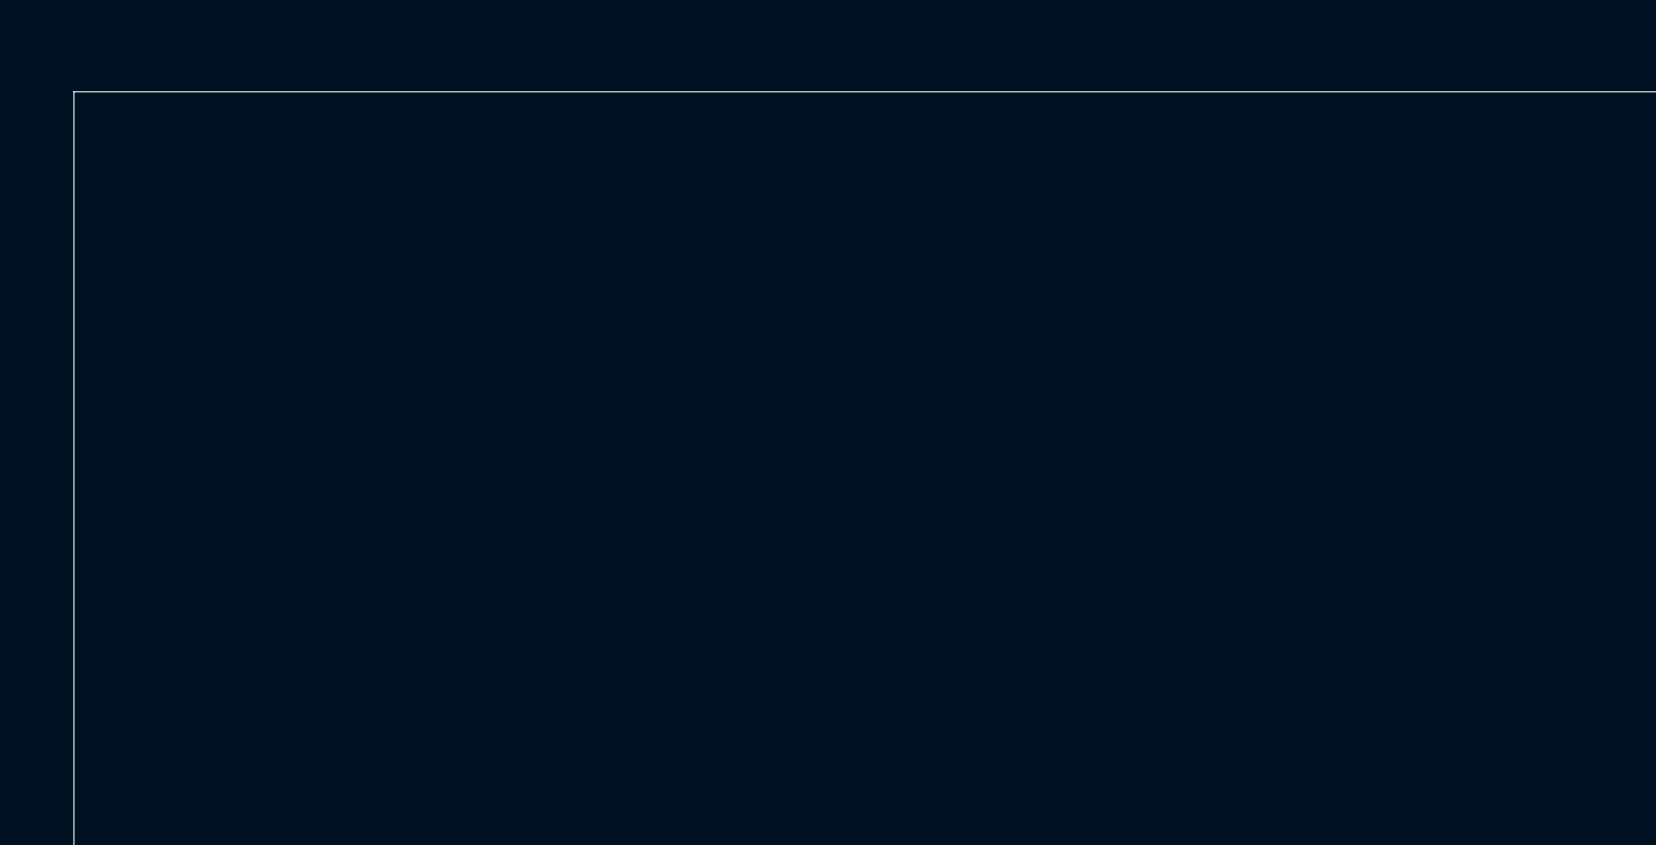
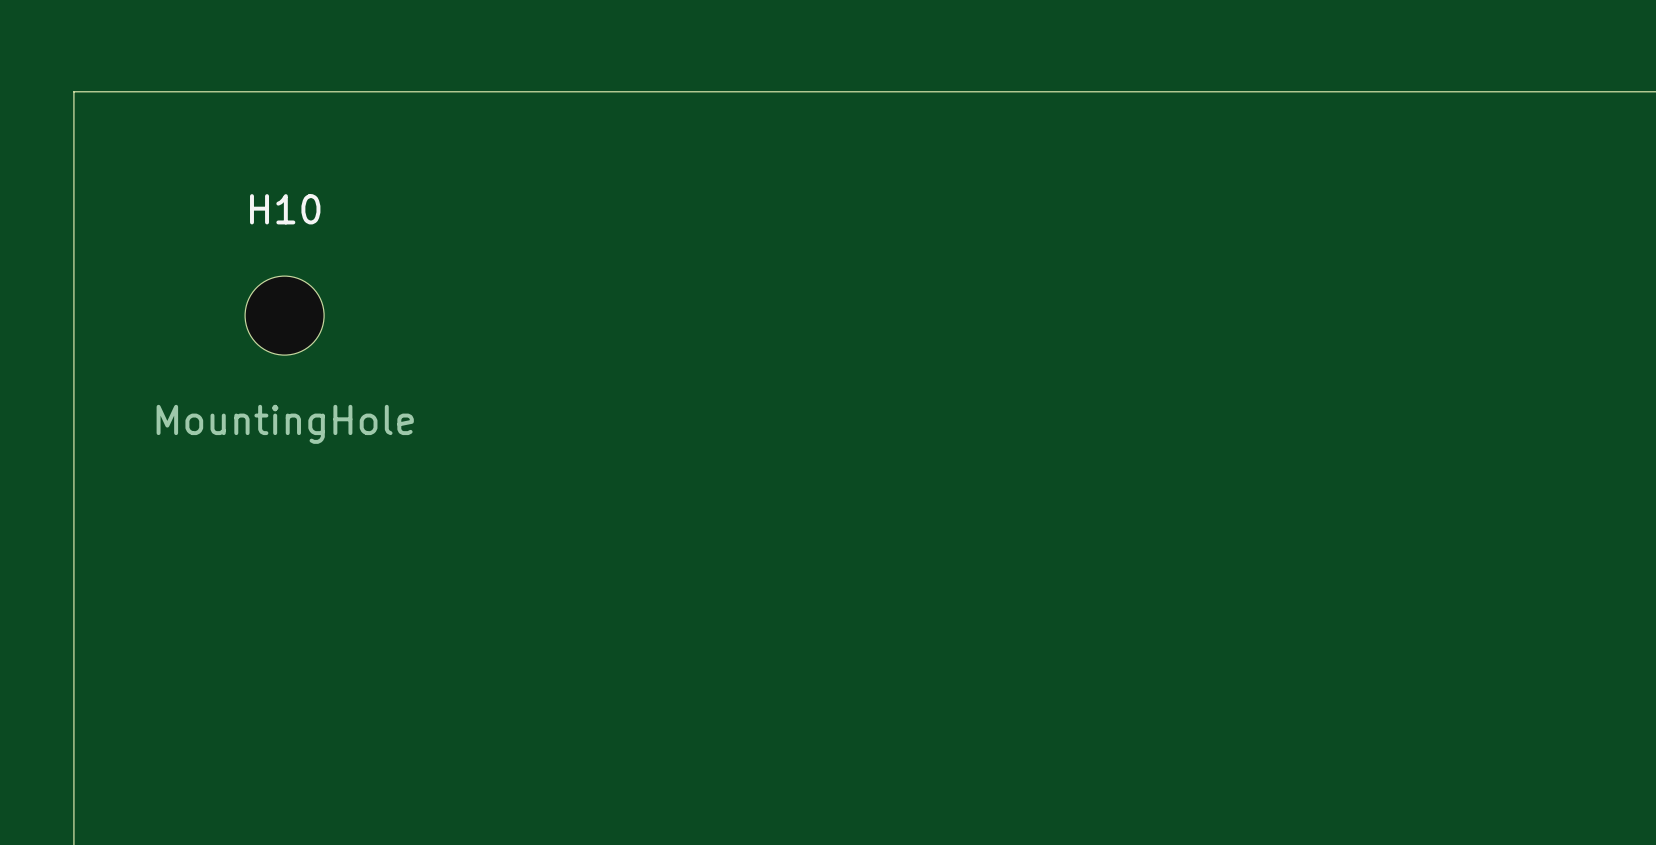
H10: none -> MountingHole (284, 315)

